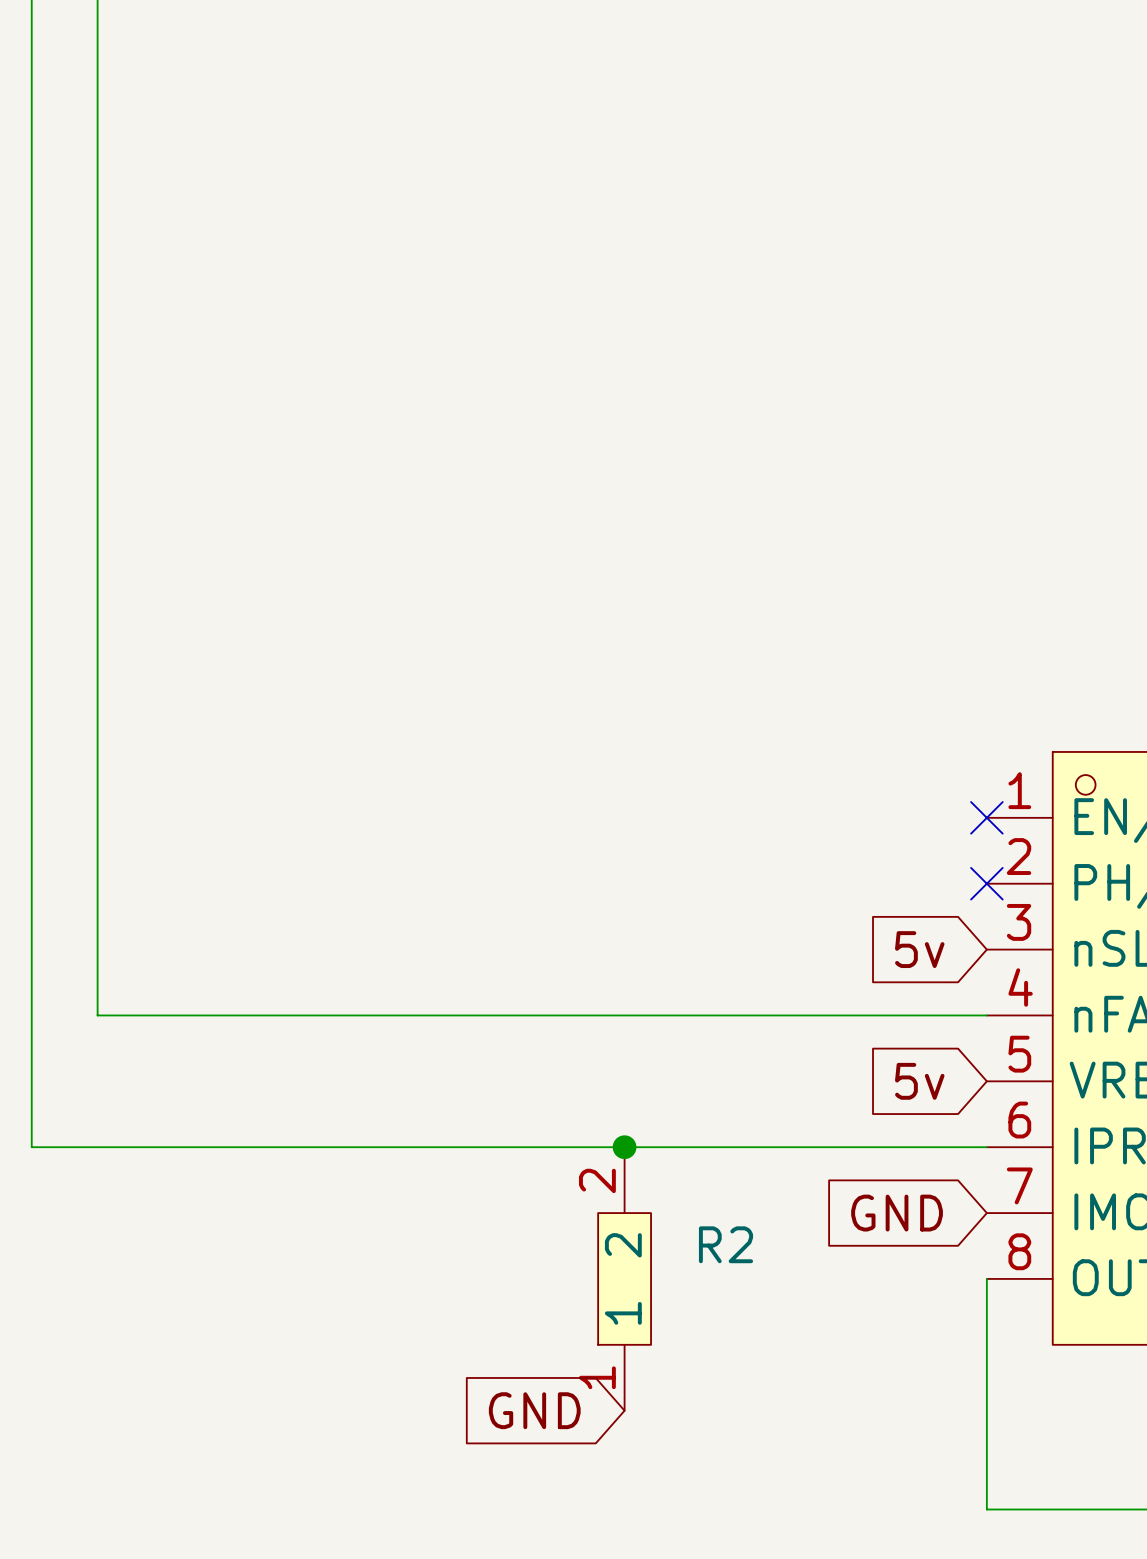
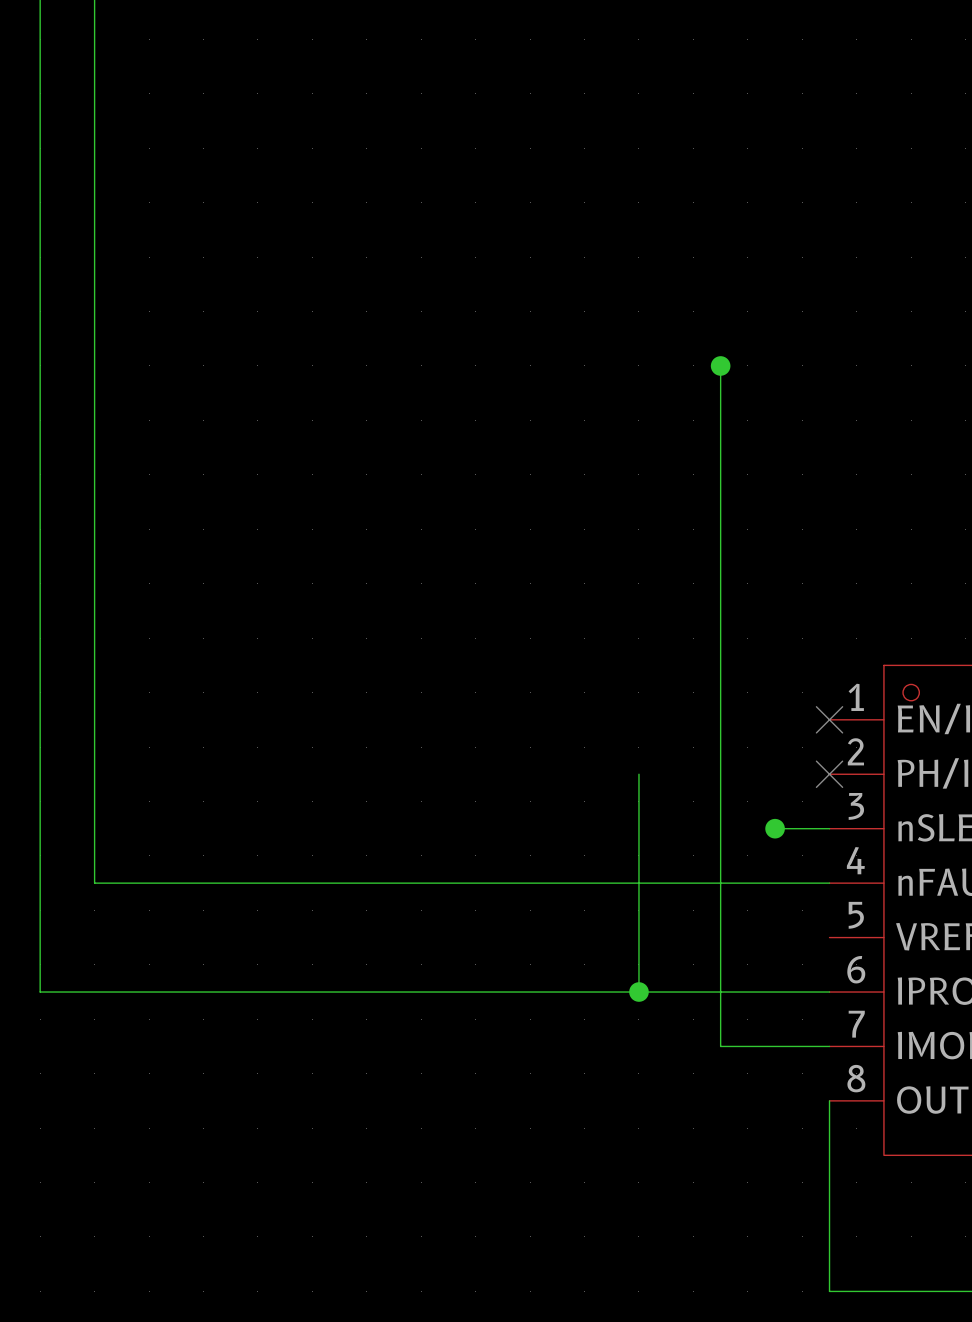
wire: none -> (720, 365) (720, 1046) (829, 1046)
junction: none -> (720, 365)
wire: none -> (638, 774) (638, 992)
global label: 5v (919, 949) -> none
wire: none -> (775, 828) (829, 828)
junction: none -> (775, 828)
global label: 5v (919, 1081) -> none
junction position: (624, 1147) -> (638, 992)
global label: GND (897, 1213) -> none
R2: (624, 1278) -> none
global label: GND (534, 1410) -> none

